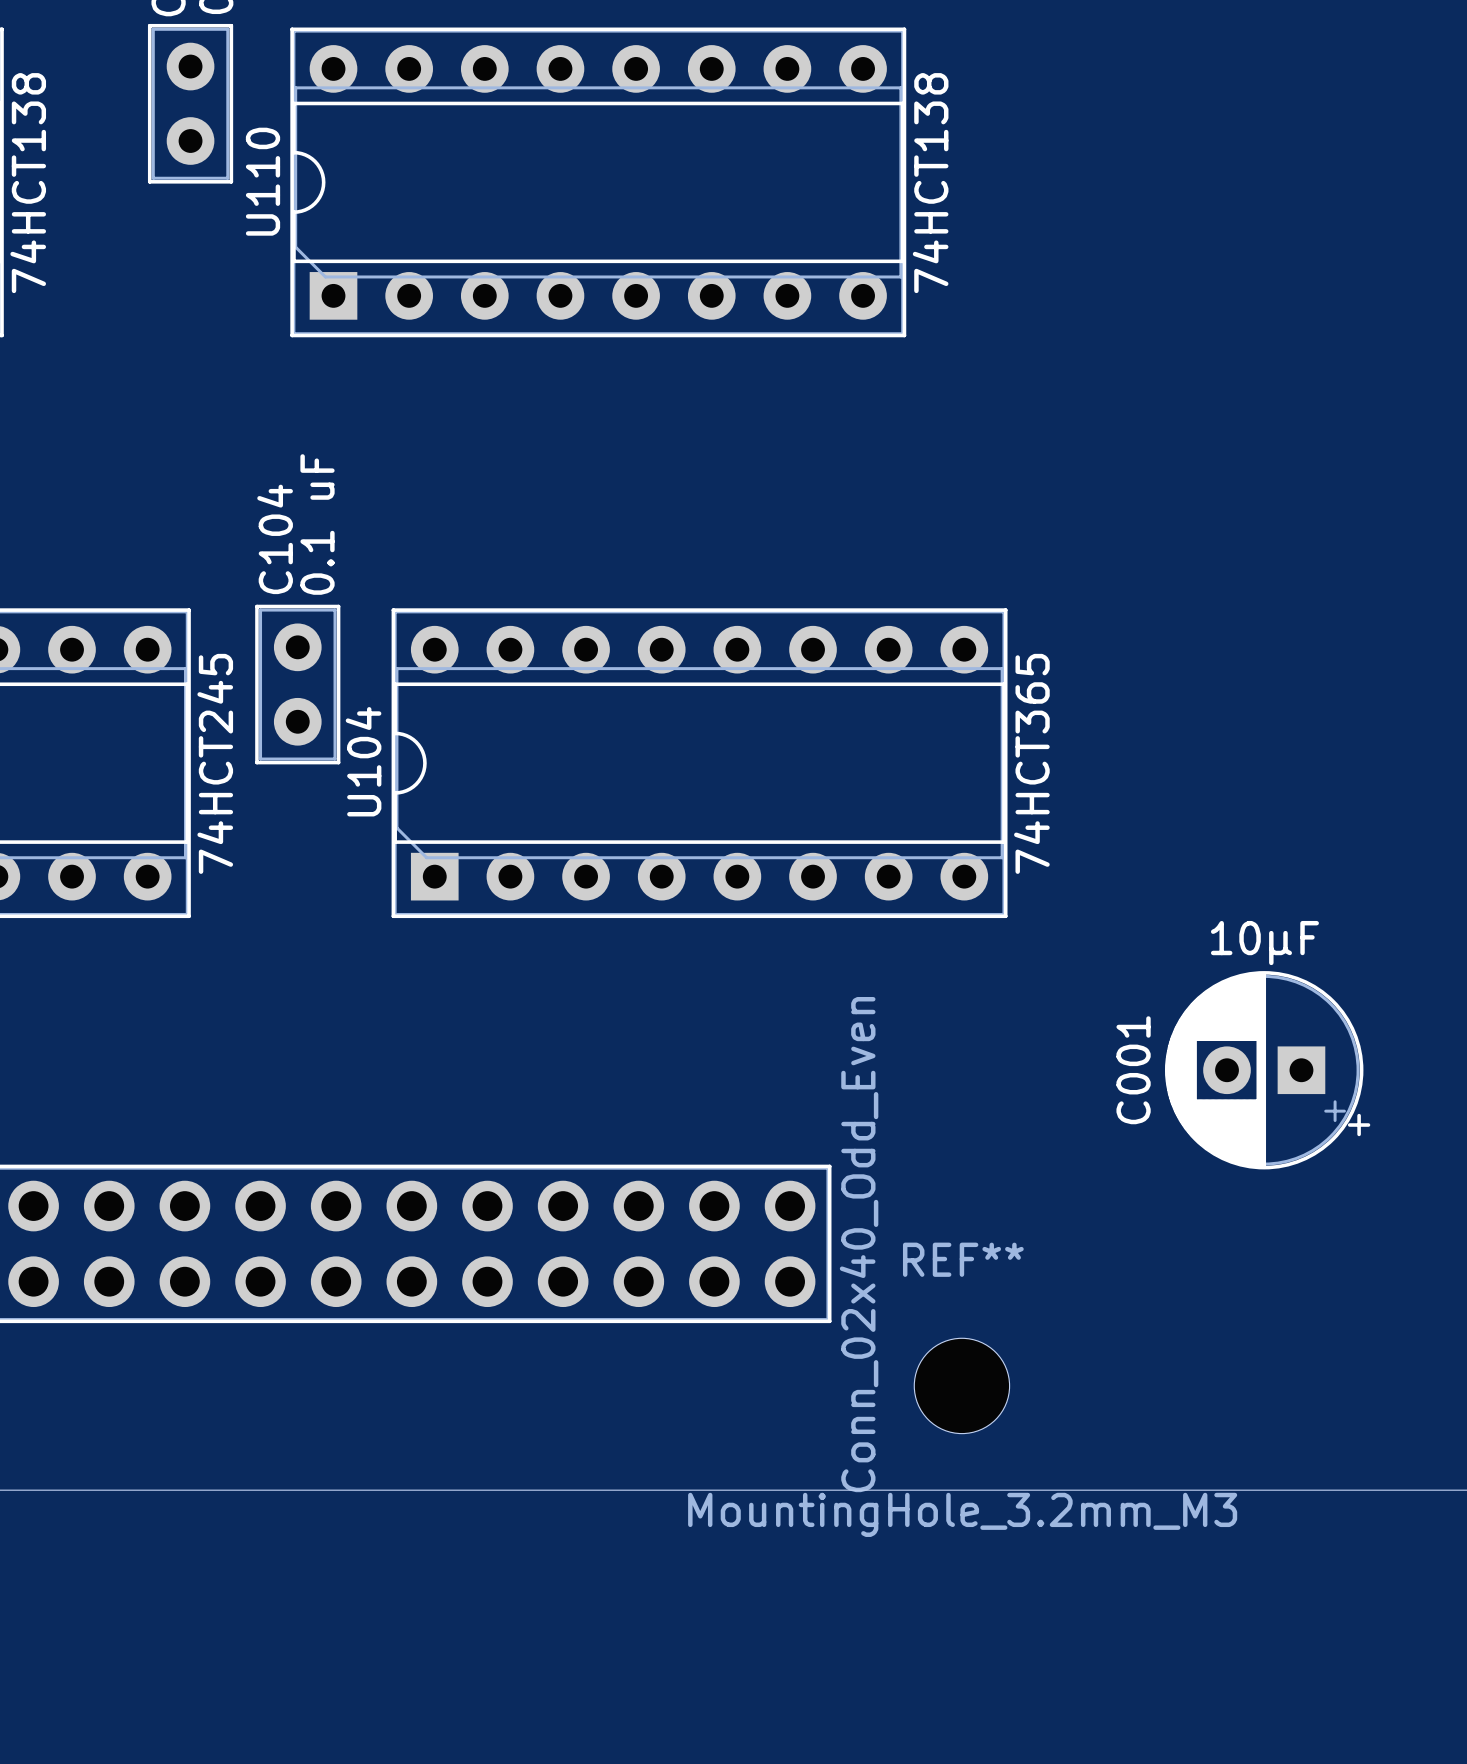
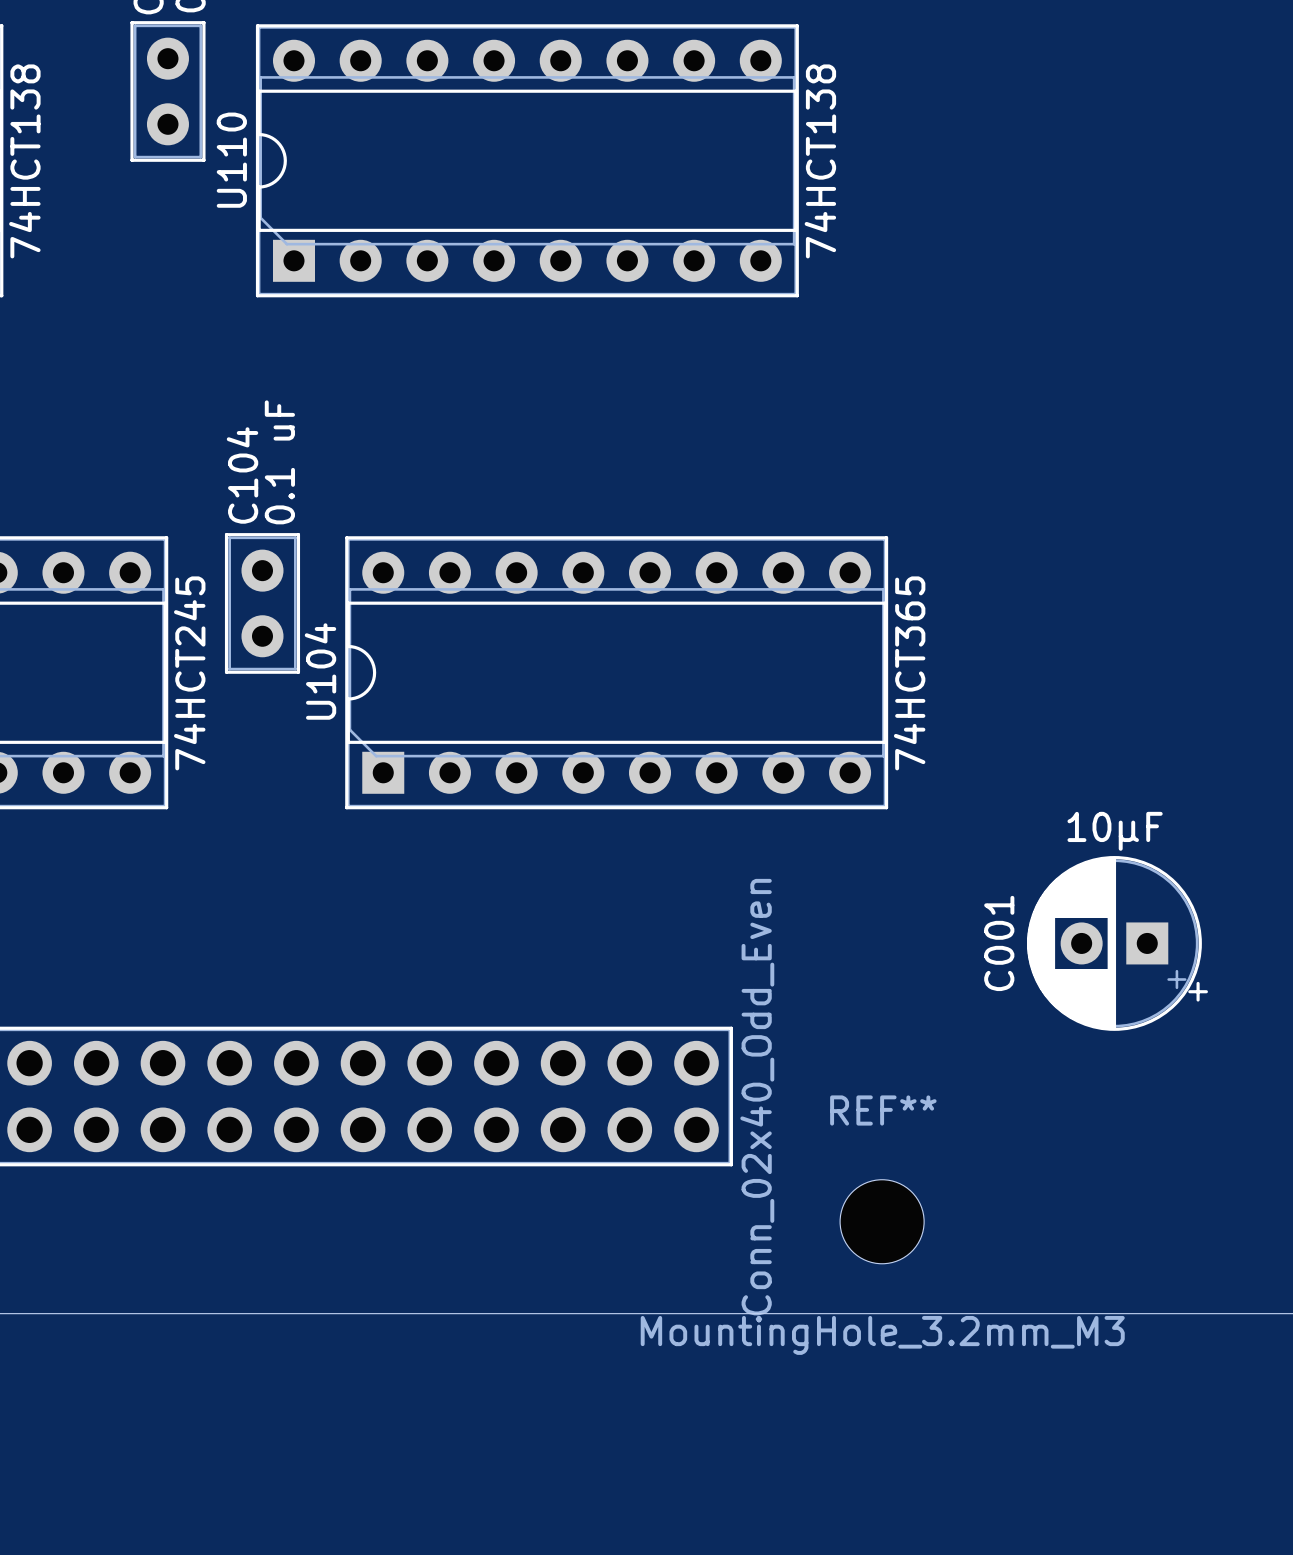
REF** position: (961, 1385) -> (882, 1221)

